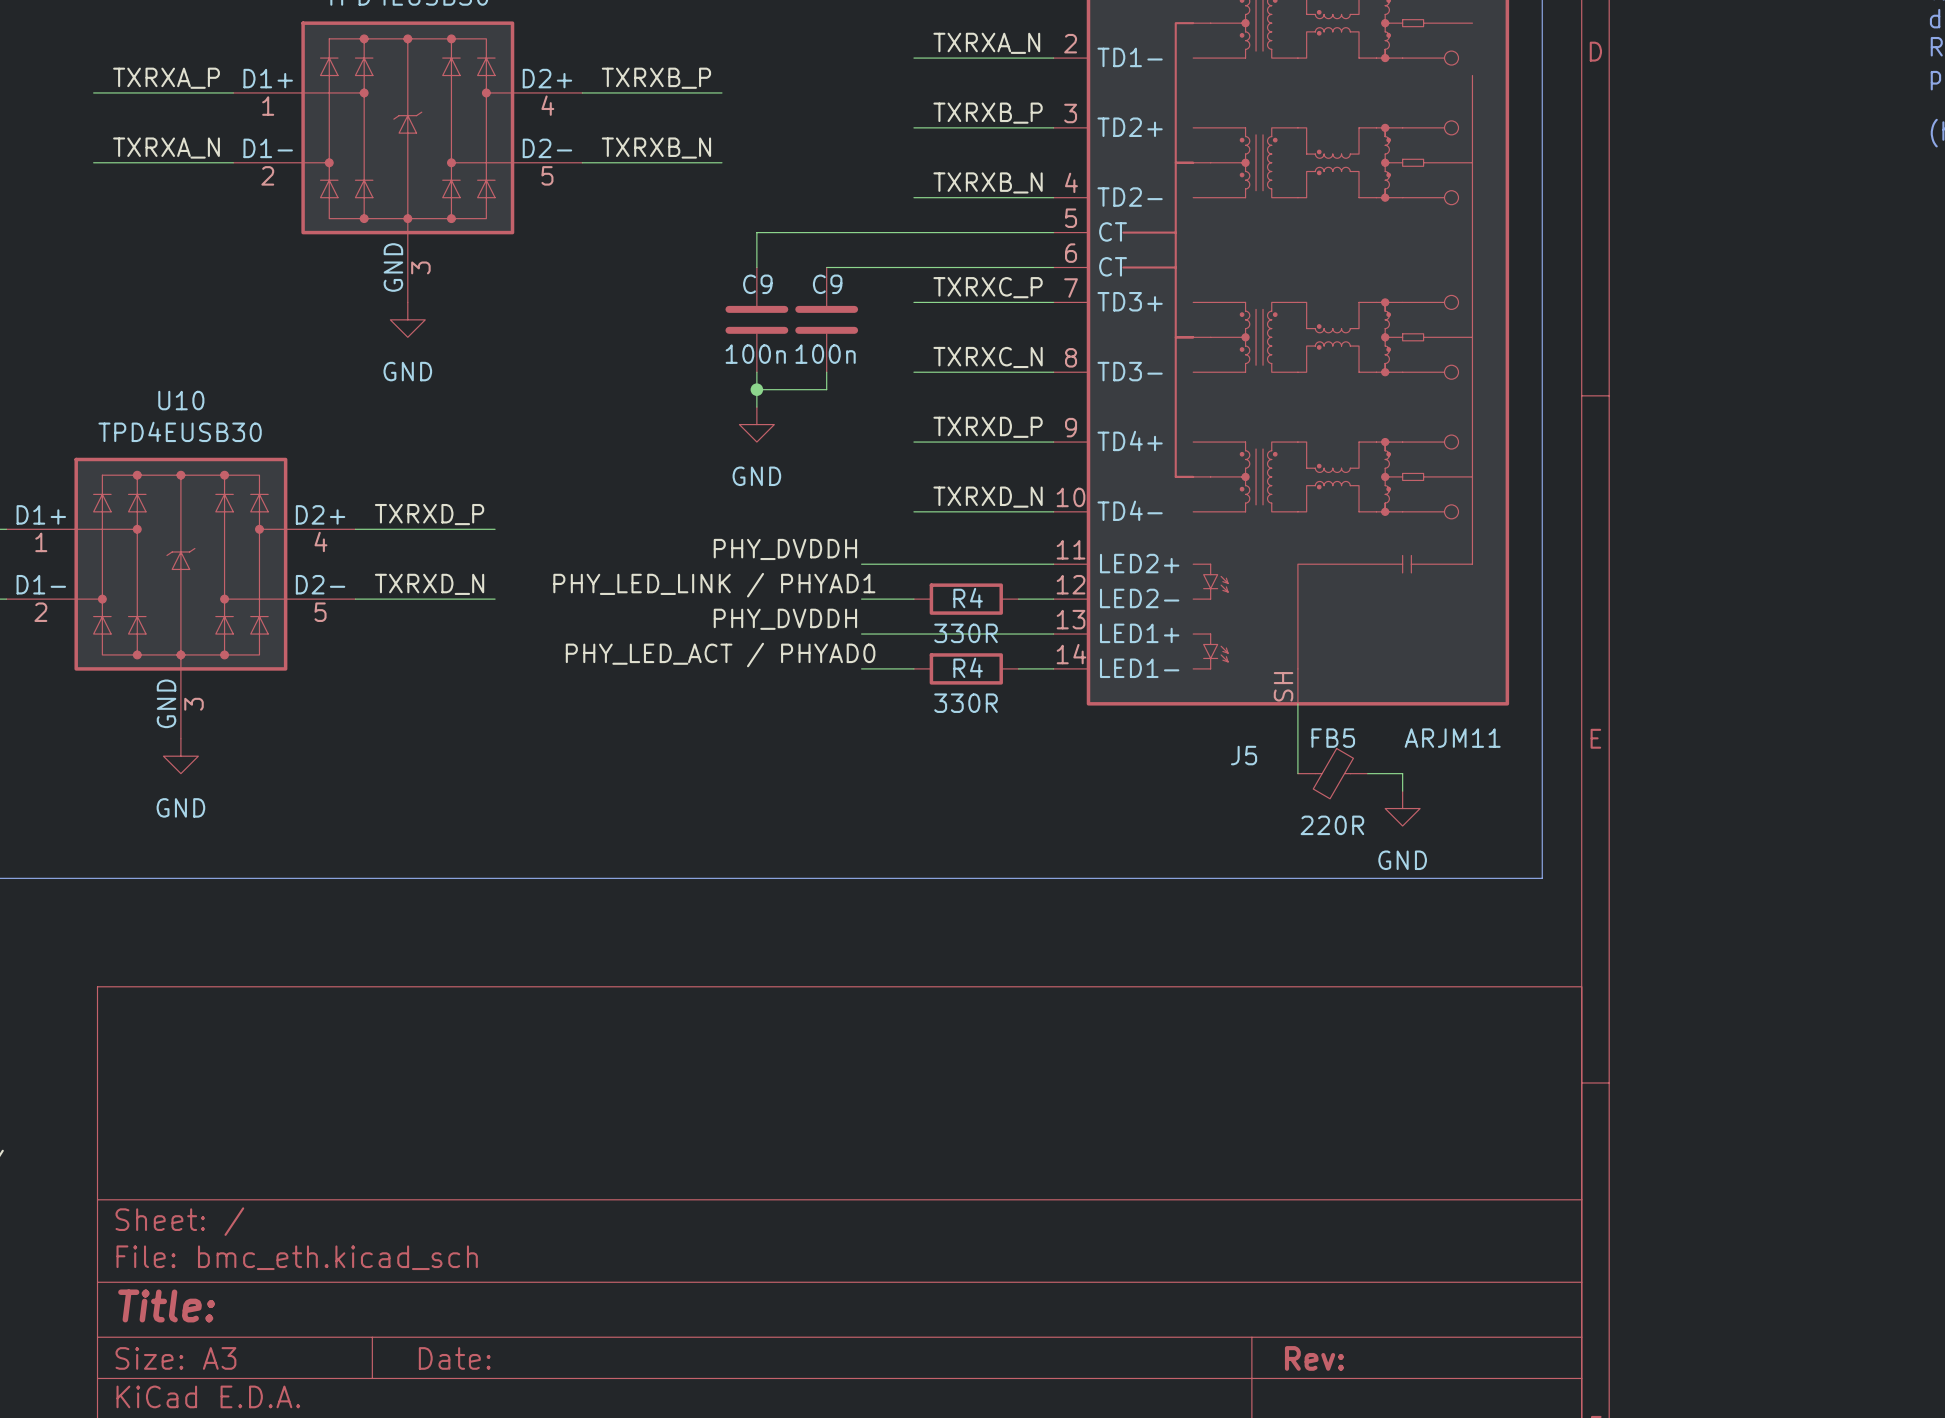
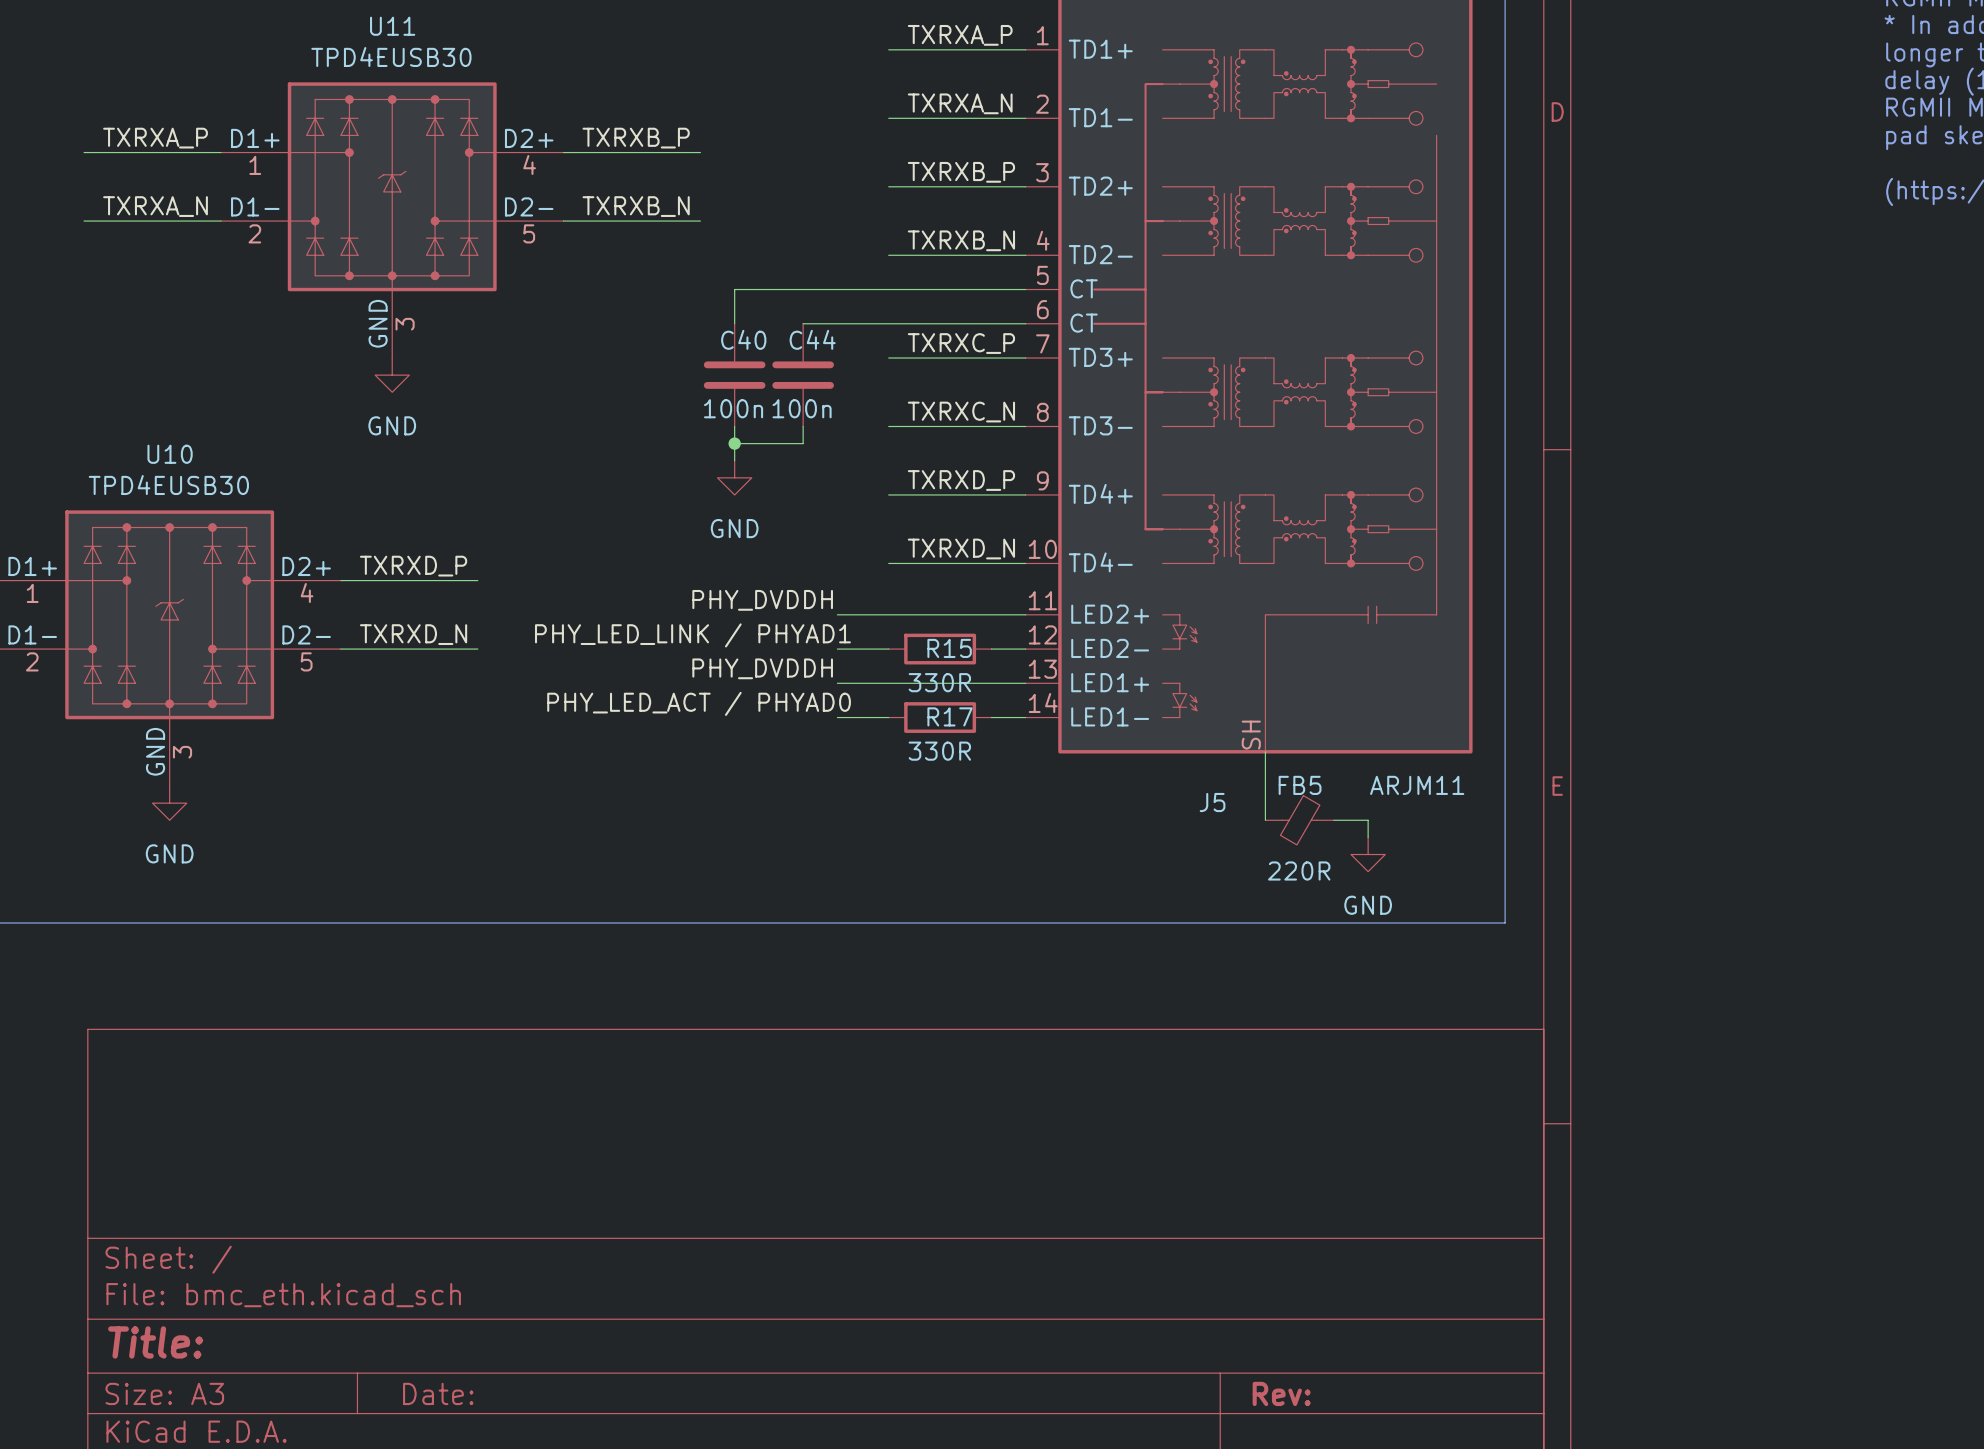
C9 name: C9 (757, 284) -> C40 (743, 339)
C9 name: C9 (827, 284) -> C44 (812, 339)
R4 name: R4 (968, 598) -> R15 (949, 648)
R4 name: R4 (968, 667) -> R17 (950, 716)

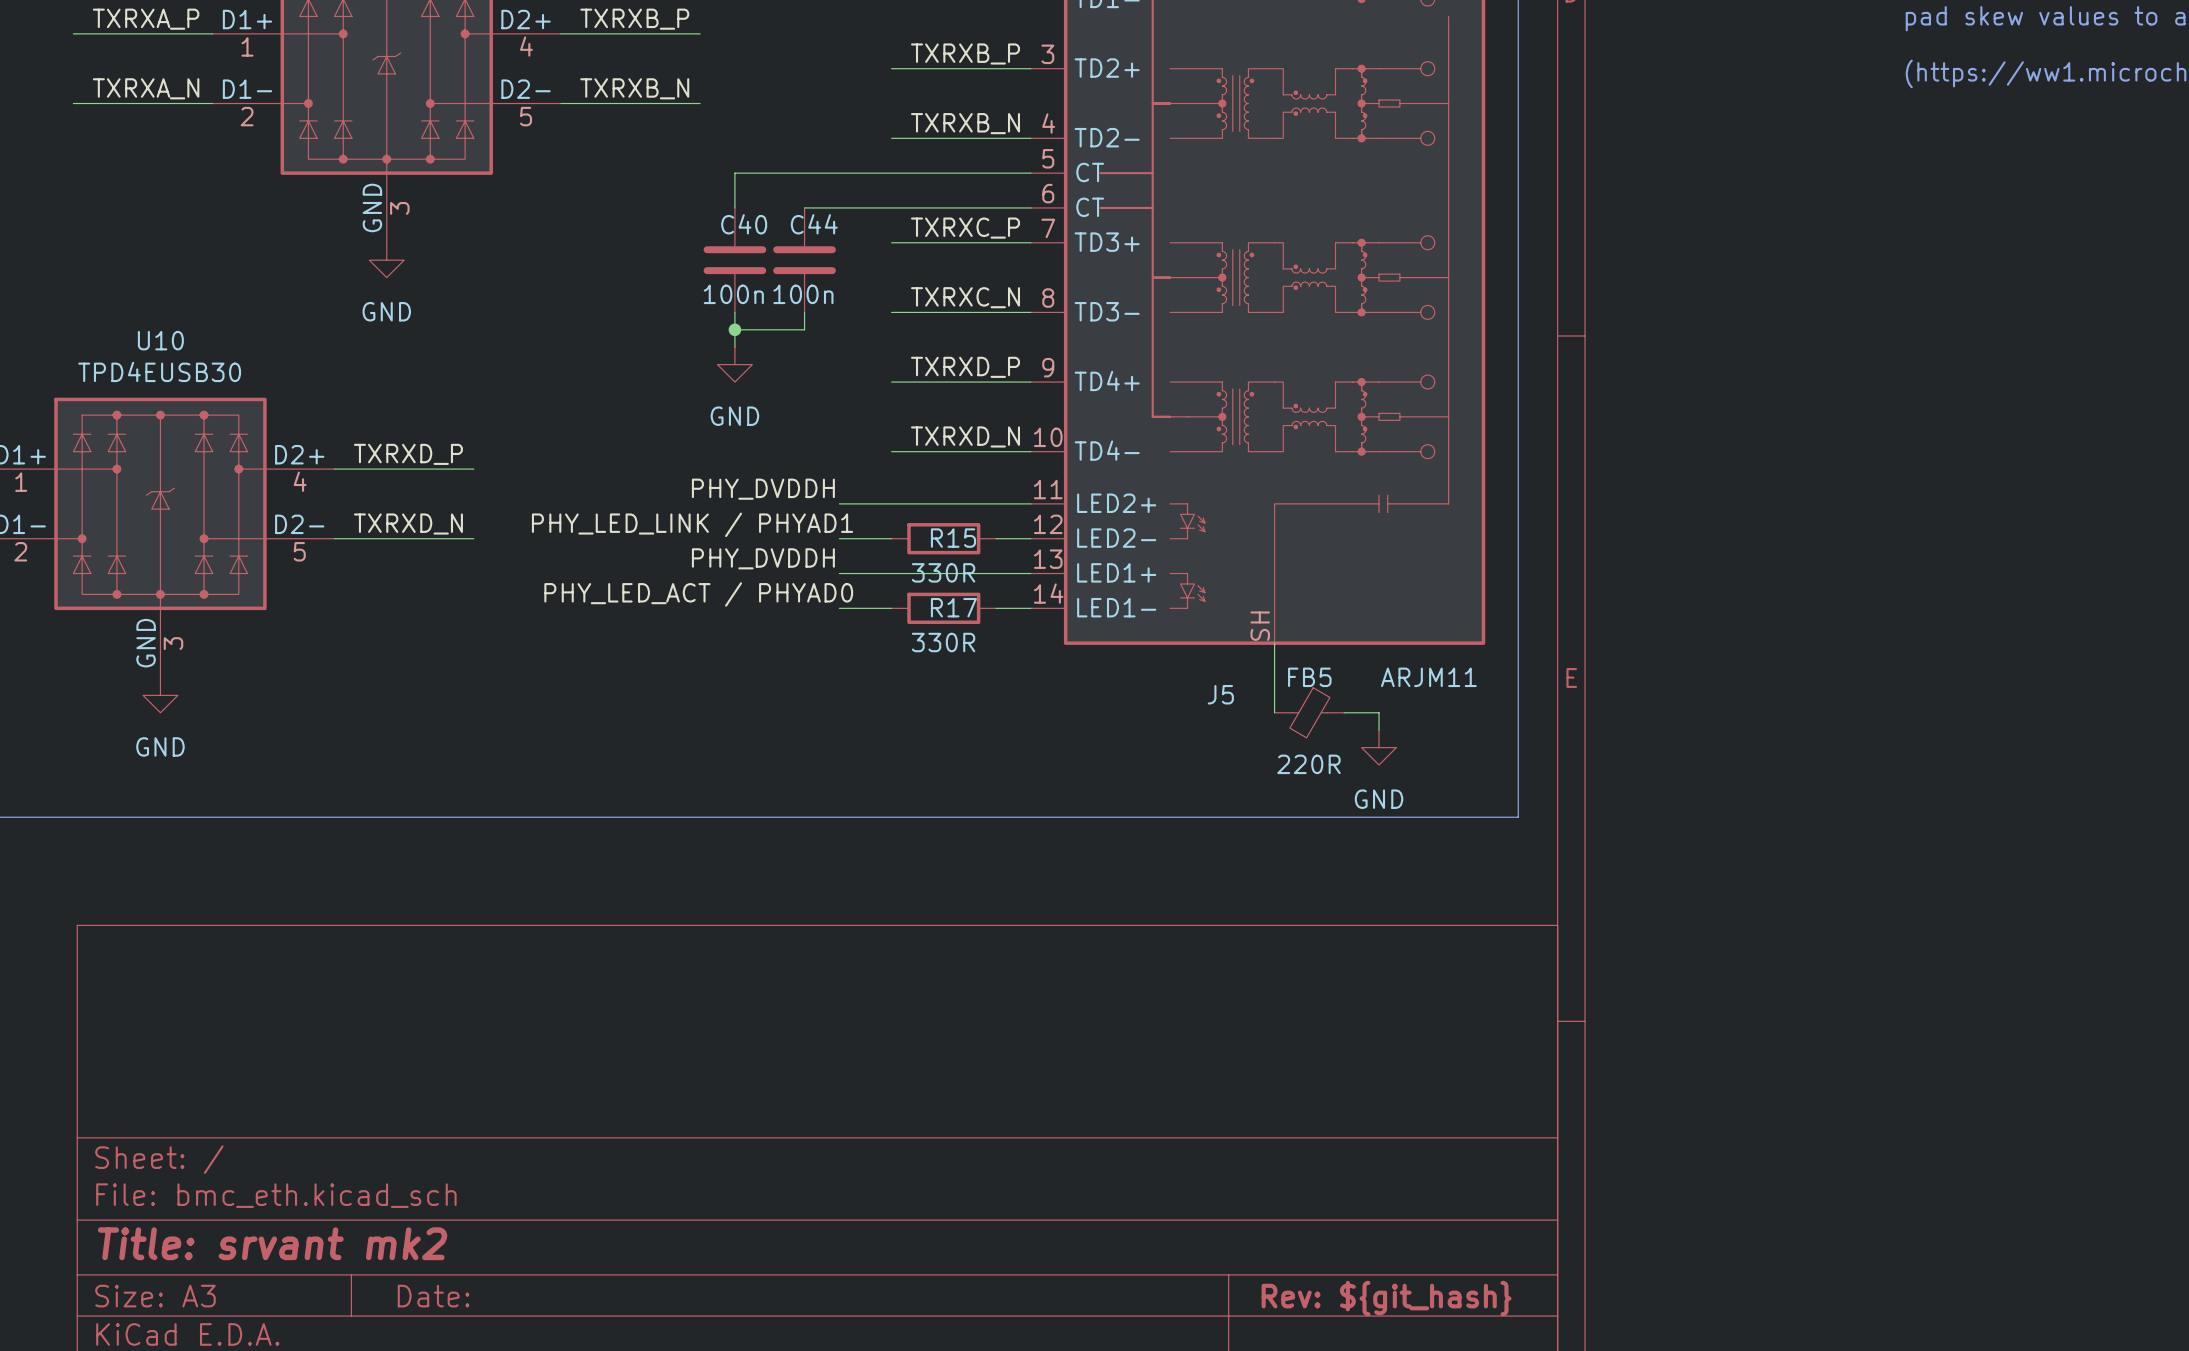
title block: Title: (155, 1342) -> Title: srvant mk2 (272, 1243)
title block: Rev: (1281, 1393) -> Rev: ${git_hash} (1386, 1298)

